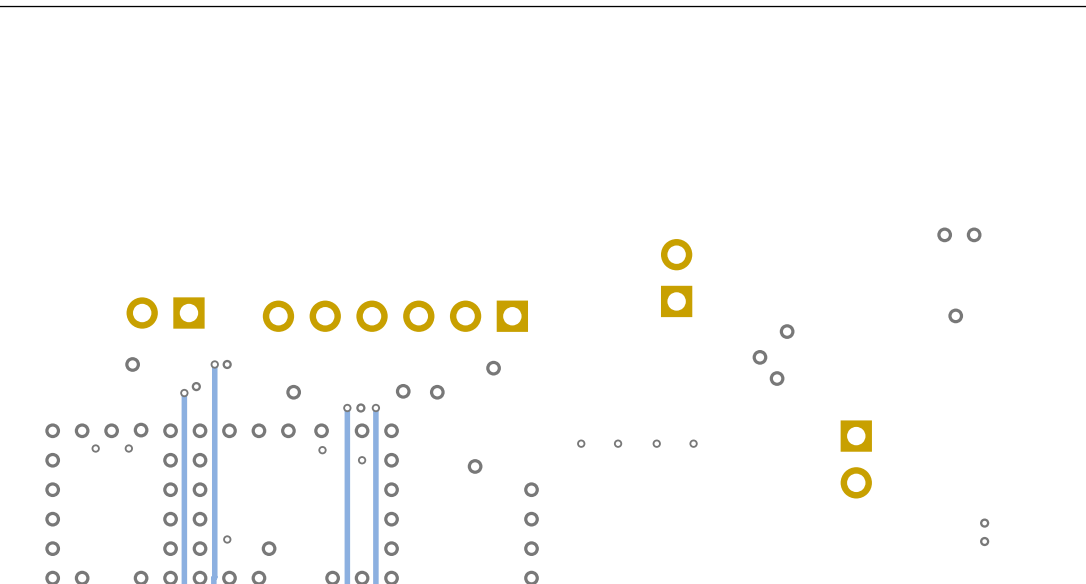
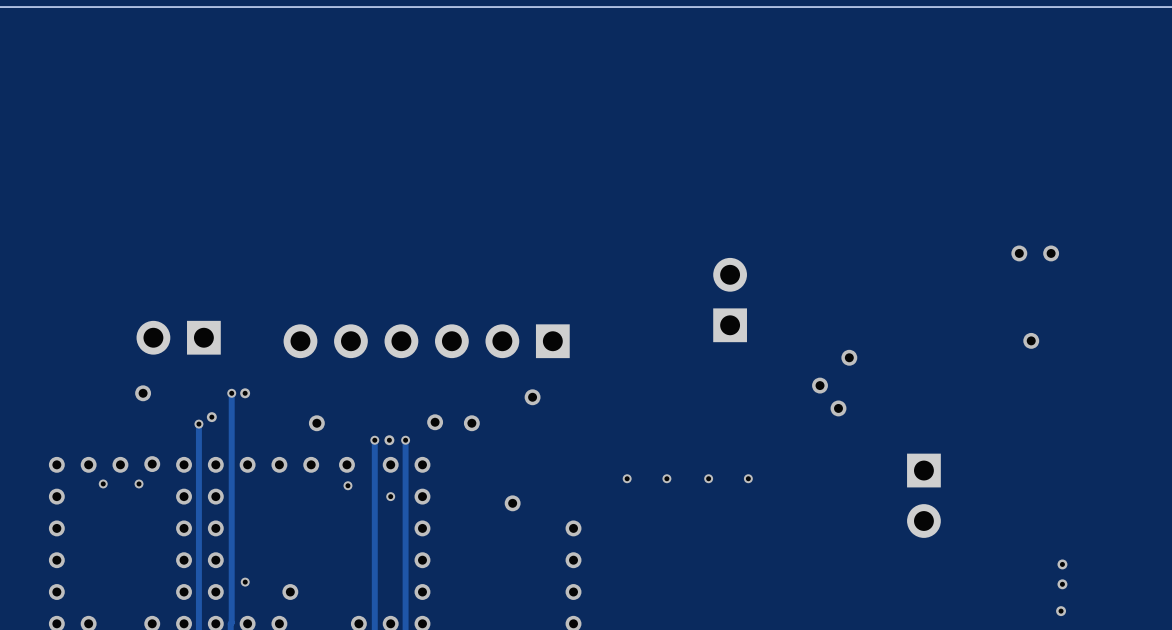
via: none -> (1061, 611)

